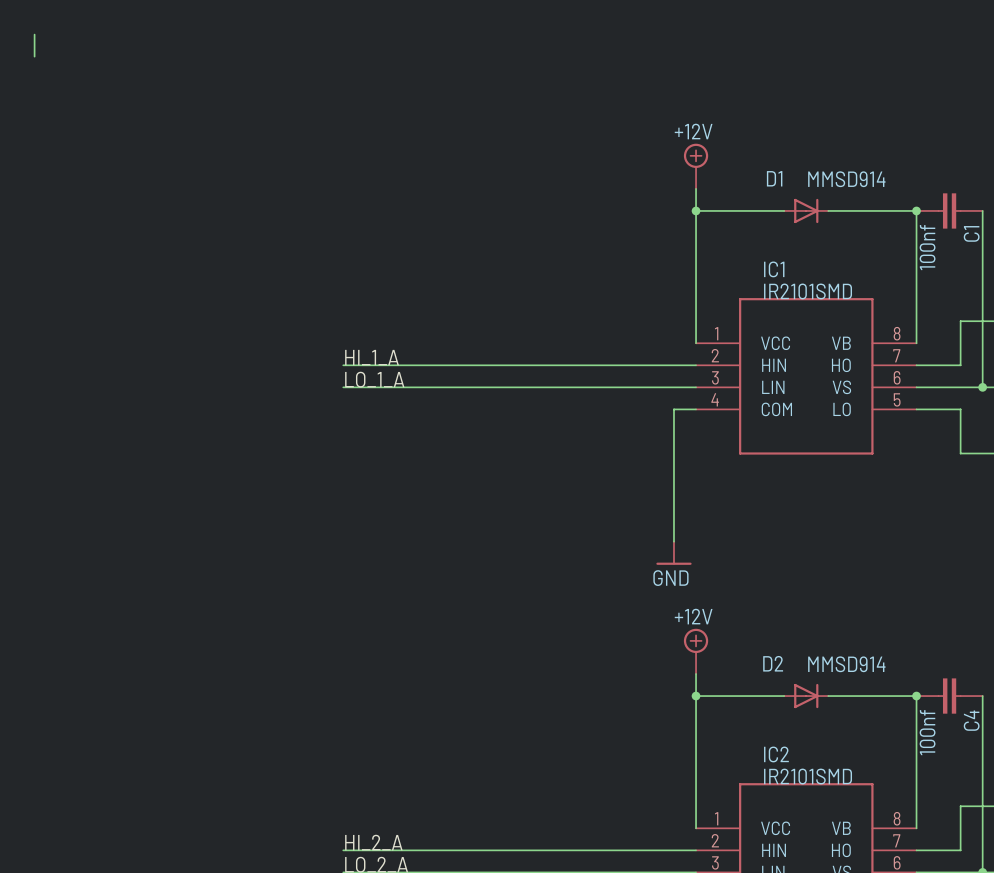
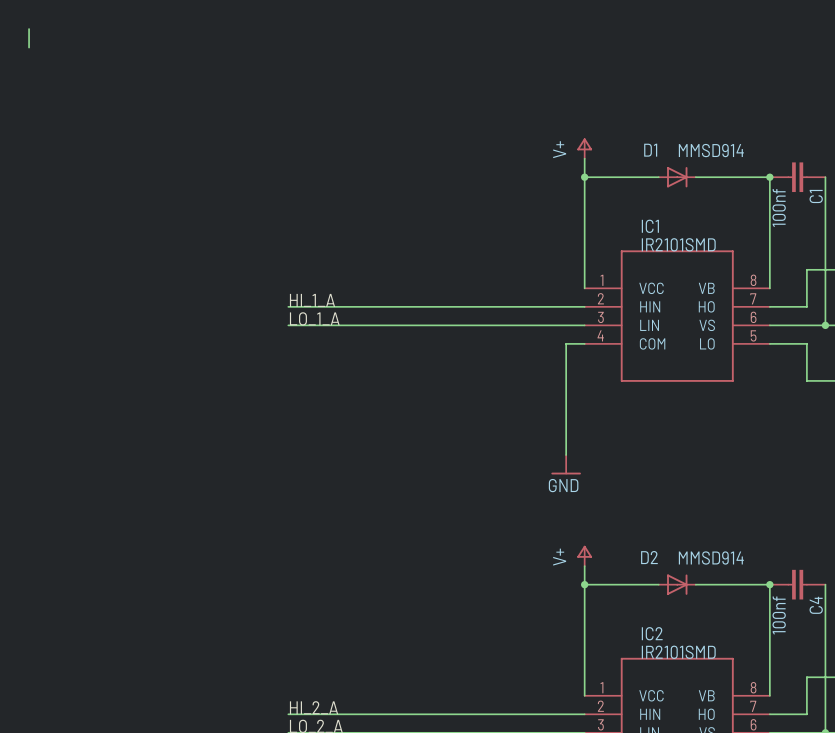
power symbol: +12V (696, 166) -> none
power symbol: none -> V+ (584, 148)
power symbol: +12V (696, 651) -> none
power symbol: none -> V+ (584, 555)

